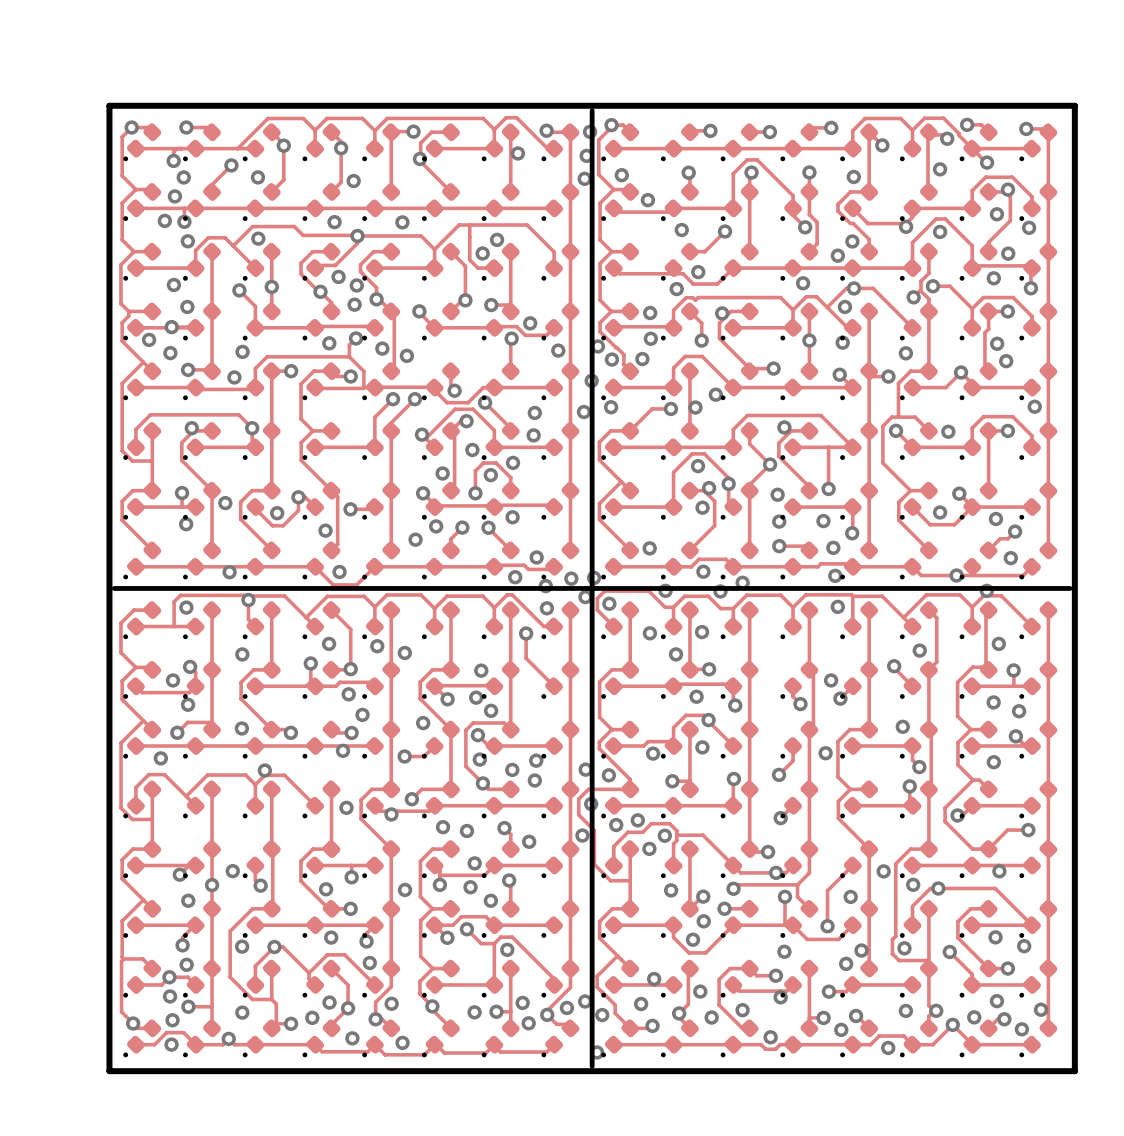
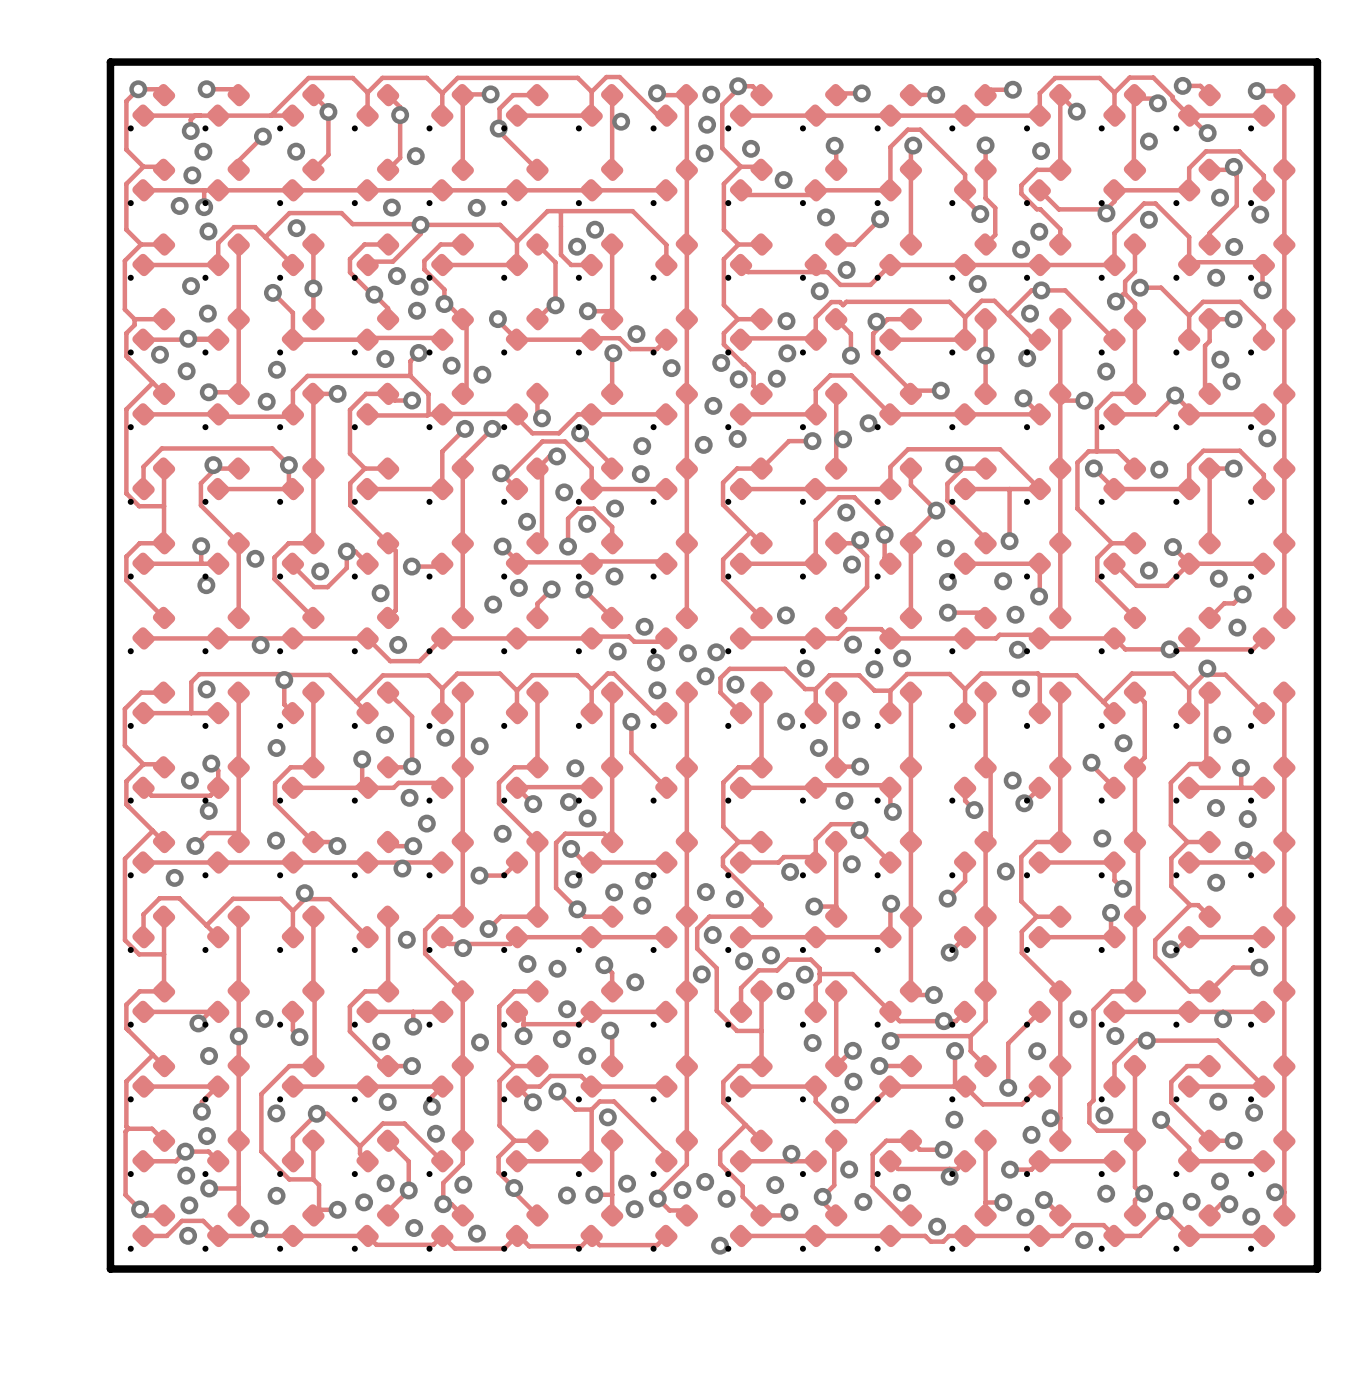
line: (592, 110) (592, 1066) -> none
line: (114, 588) (1070, 588) -> none

